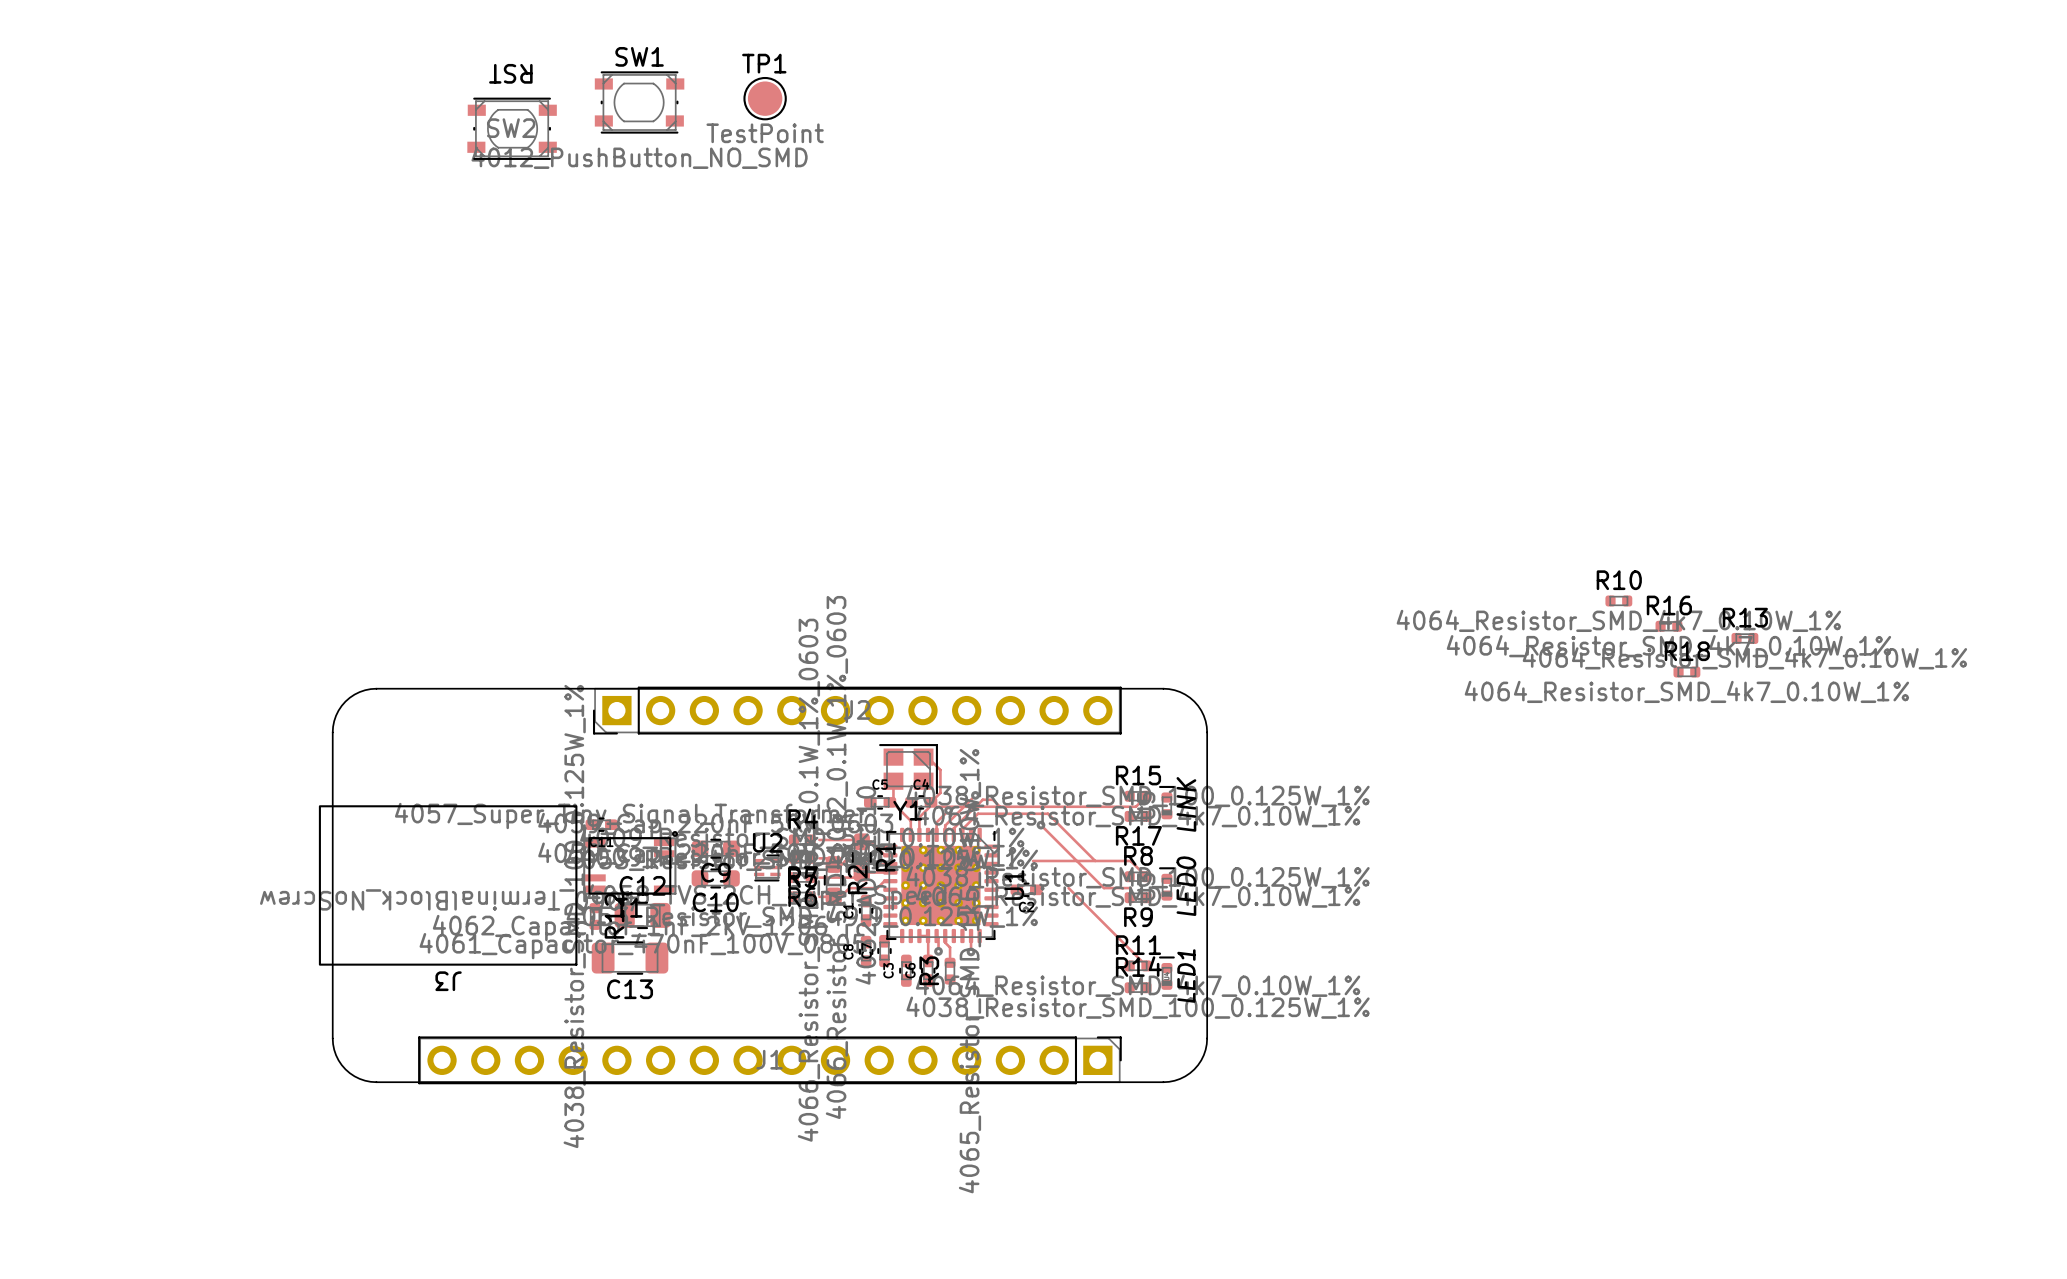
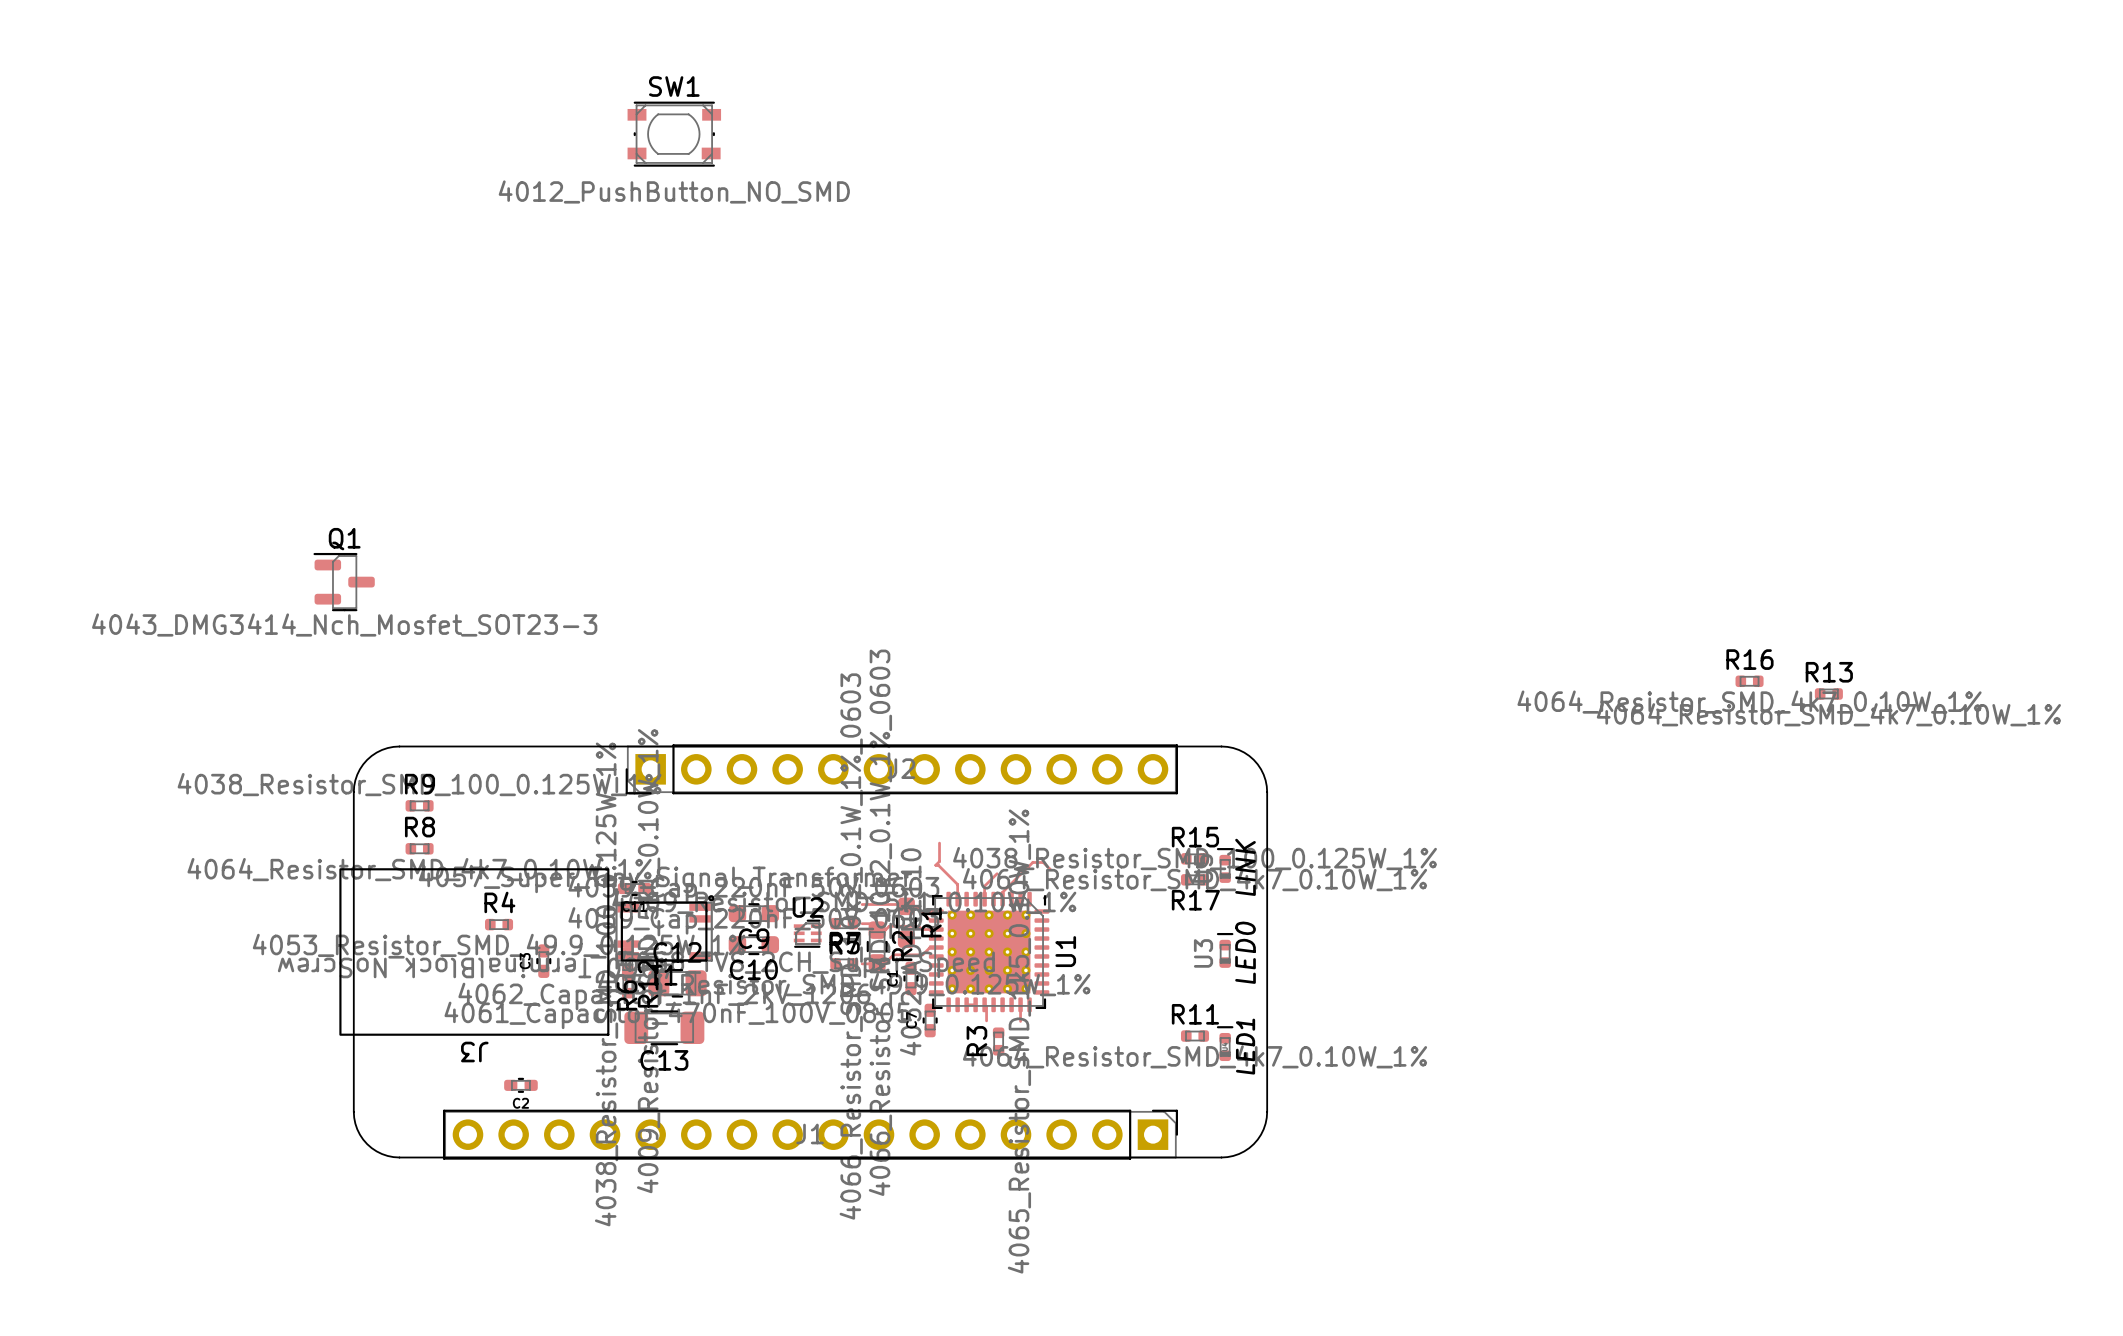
TP1: TestPoint (765, 98) -> none
SW2: RST (512, 128) -> none
Q1: none -> 4043_DMG3414_Nch_Mosfet_SOT23-3 (344, 582)
R10: 4064_Resistor_SMD_4k7_0.10W_1% (1618, 600) -> none
R18: 4064_Resistor_SMD_4k7_0.10W_1% (1686, 672) -> none
track: (923, 757) (927, 757) (940, 770) (940, 792) (919, 817) (919, 834) -> none
Y1: (908, 769) -> none
track: (975, 795) (945, 825) (945, 834) -> none
via: (975, 795) -> none
track: (1146, 796) (1135, 806) (937, 806) -> none
C5: (880, 802) -> none
C4: (921, 802) -> none
via: (948, 810) -> none
track: (1041, 825) (1103, 888) (1130, 888) -> none
via: (1041, 825) -> none
track: (962, 834) (962, 829) (978, 813) (1048, 813) (1095, 860) -> none
R4 position: (802, 839) -> (499, 924)
track: (1033, 860) (1130, 860) (1146, 876) -> none
track: (890, 872) (866, 872) (861, 877) (819, 877) -> none
R8 position: (1138, 876) -> (419, 848)
R6 rotation: 0° (802, 877) -> 90° clockwise (627, 961)
R6 position: (802, 877) -> (627, 961)
track: (1068, 888) (1146, 965) -> none
C2 position: (1026, 889) -> (520, 1085)
R9 position: (1138, 897) -> (419, 805)
R9 name position: R9 (1138, 917) -> R9 (420, 784)
track: (928, 936) (928, 960) -> none
track: (945, 936) (945, 942) (950, 947) (950, 962) -> none
C8: (866, 951) -> none
via: (938, 951) -> none
via: (971, 951) -> none
C3 position: (906, 970) -> (543, 961)
C6: (928, 970) -> none
R14: 4038_Resistor_SMD_100_0.125W_1% (1138, 987) -> none

